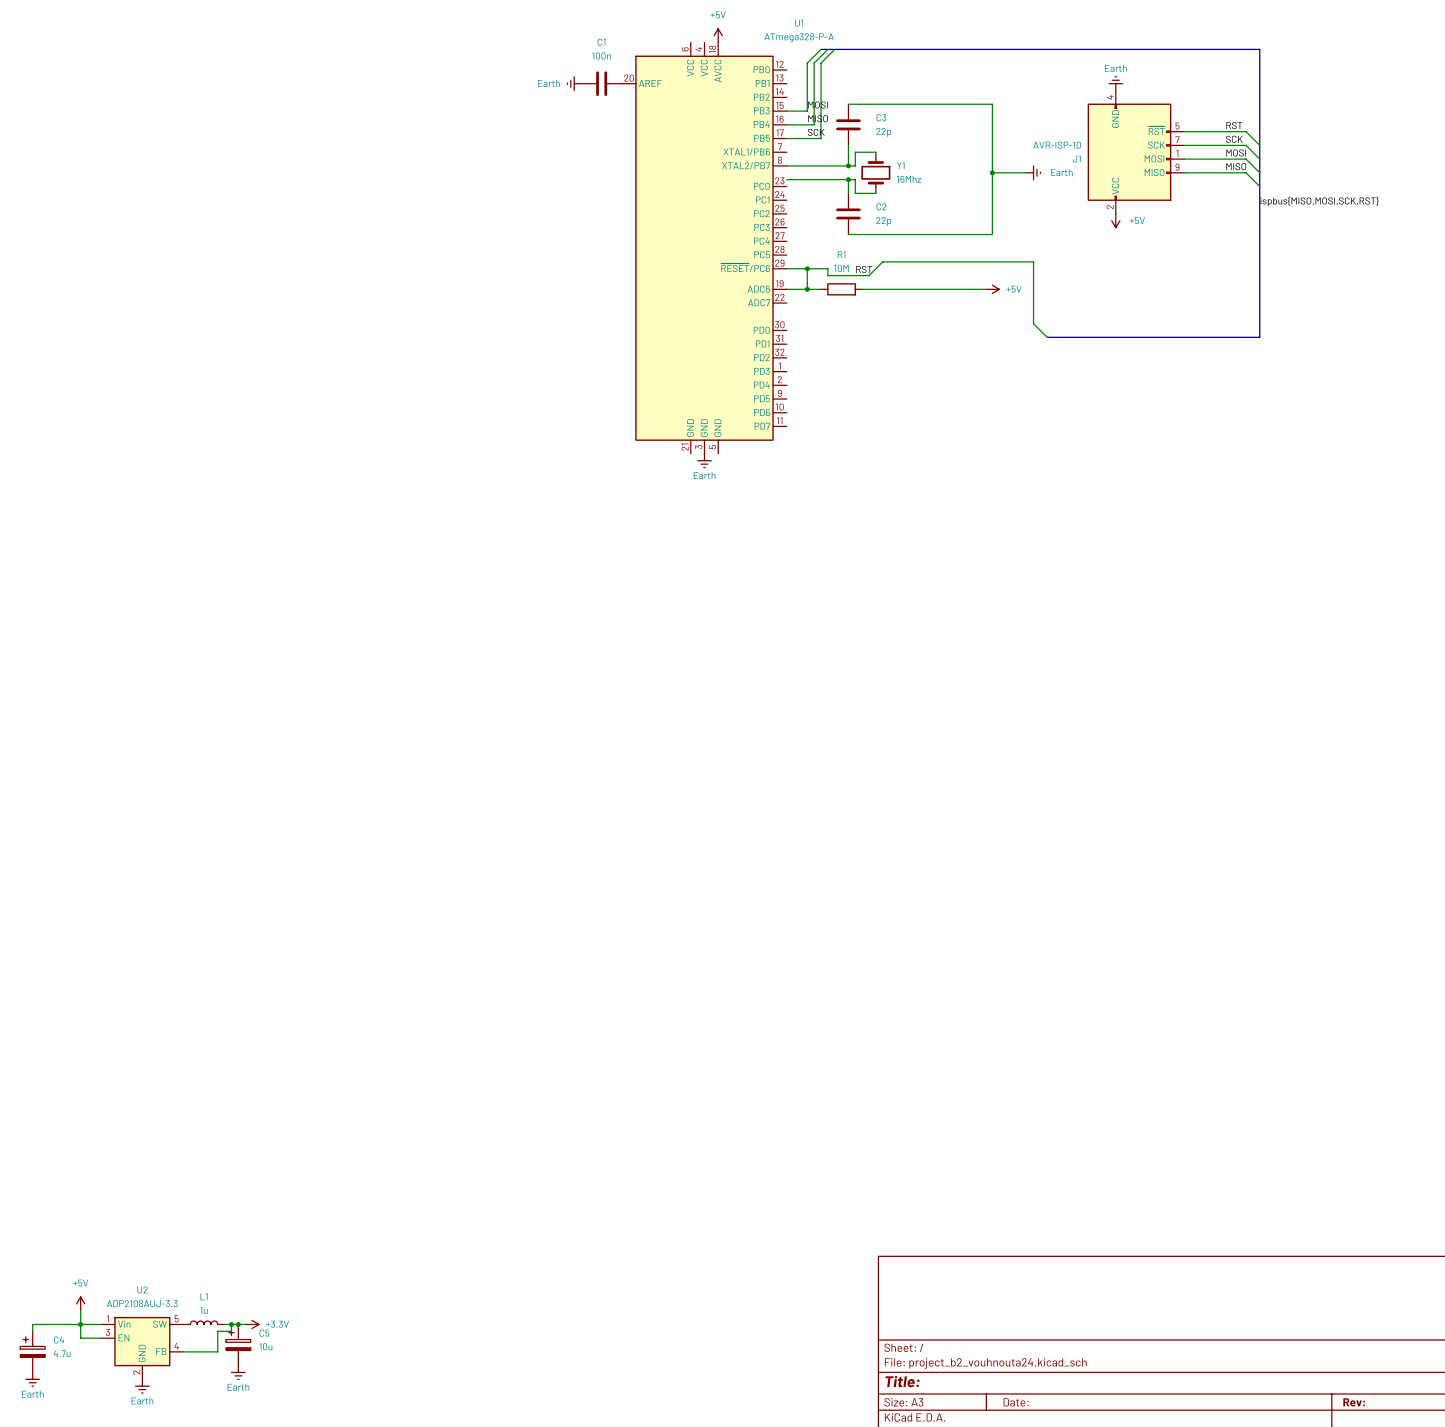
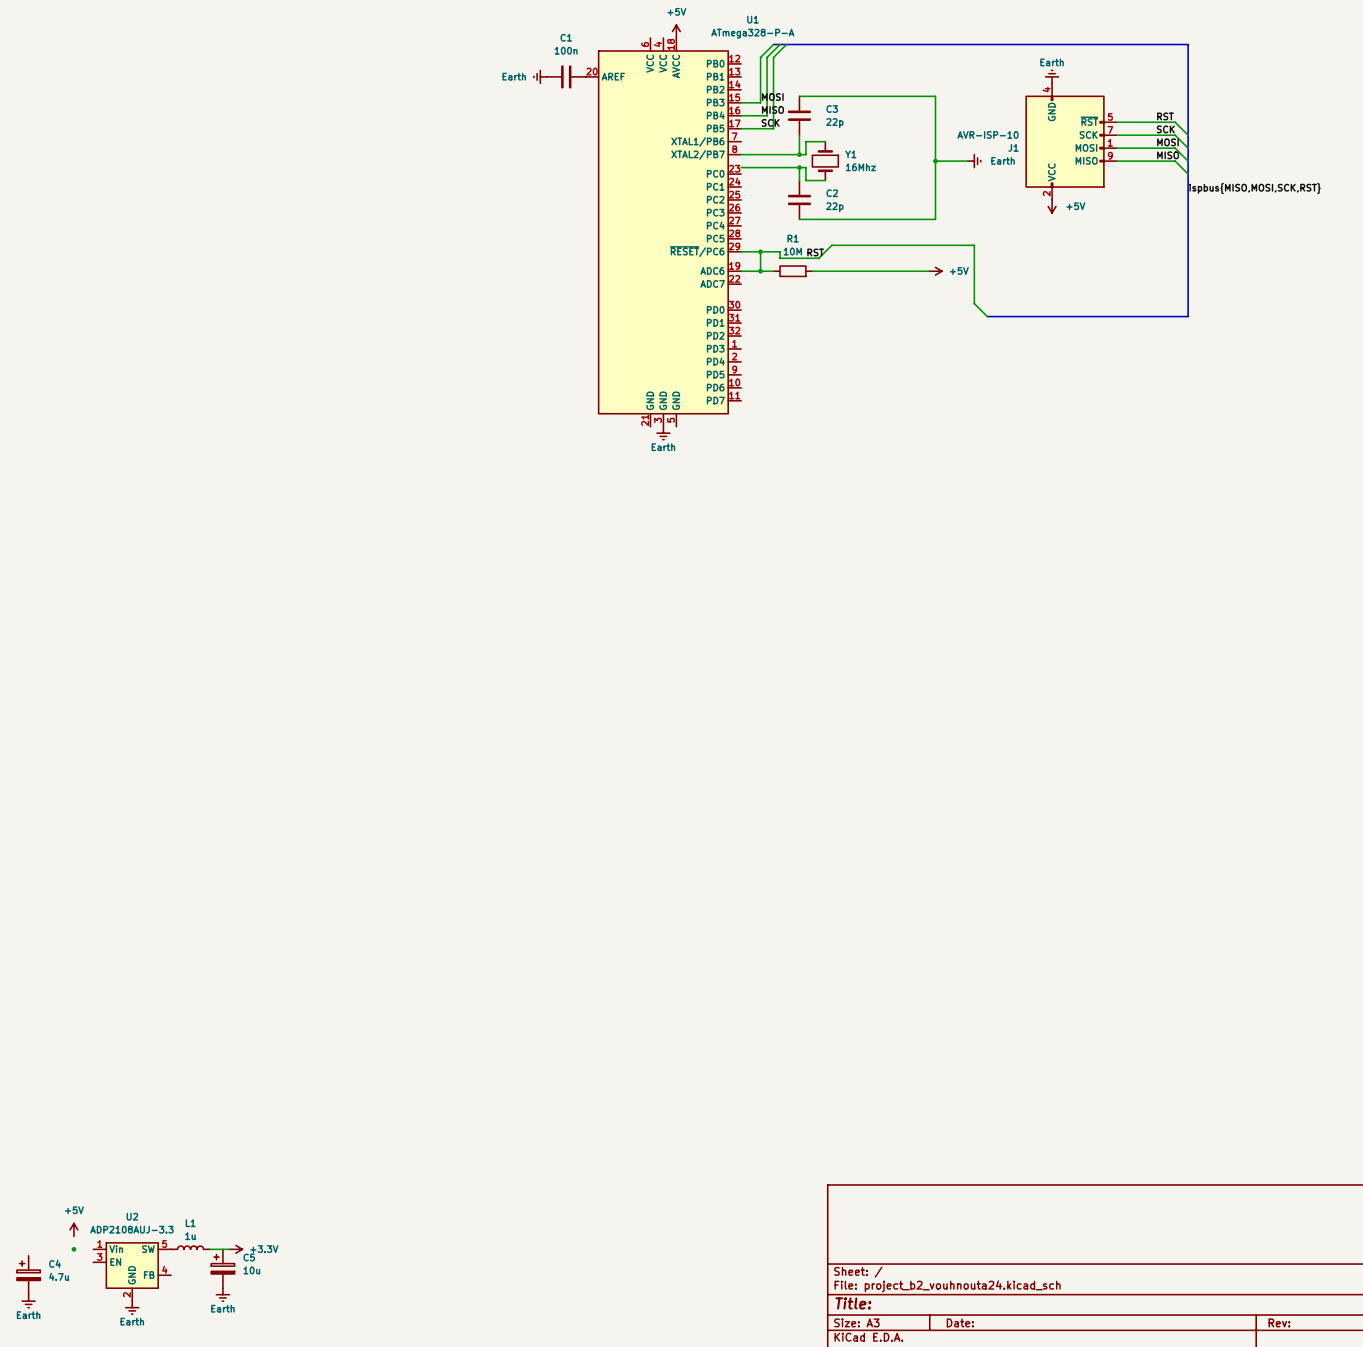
wire: (80, 1310) (80, 1338) (101, 1338) -> none
wire: (101, 1324) (32, 1324) (32, 1331) -> none
wire: (231, 1324) (231, 1331) (217, 1331) (217, 1351) (183, 1351) -> none
junction: (231, 1324) -> none
junction: (238, 1324) -> none

